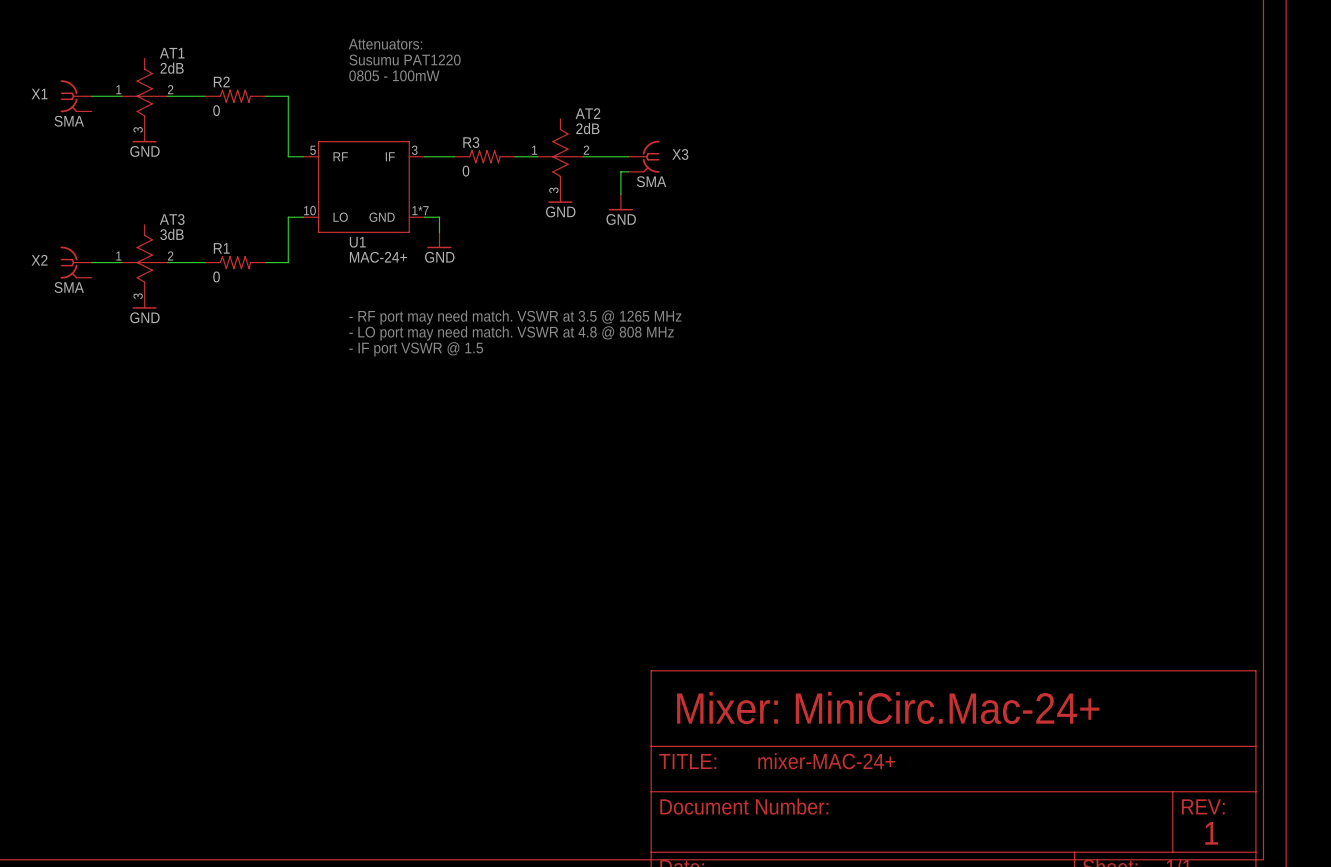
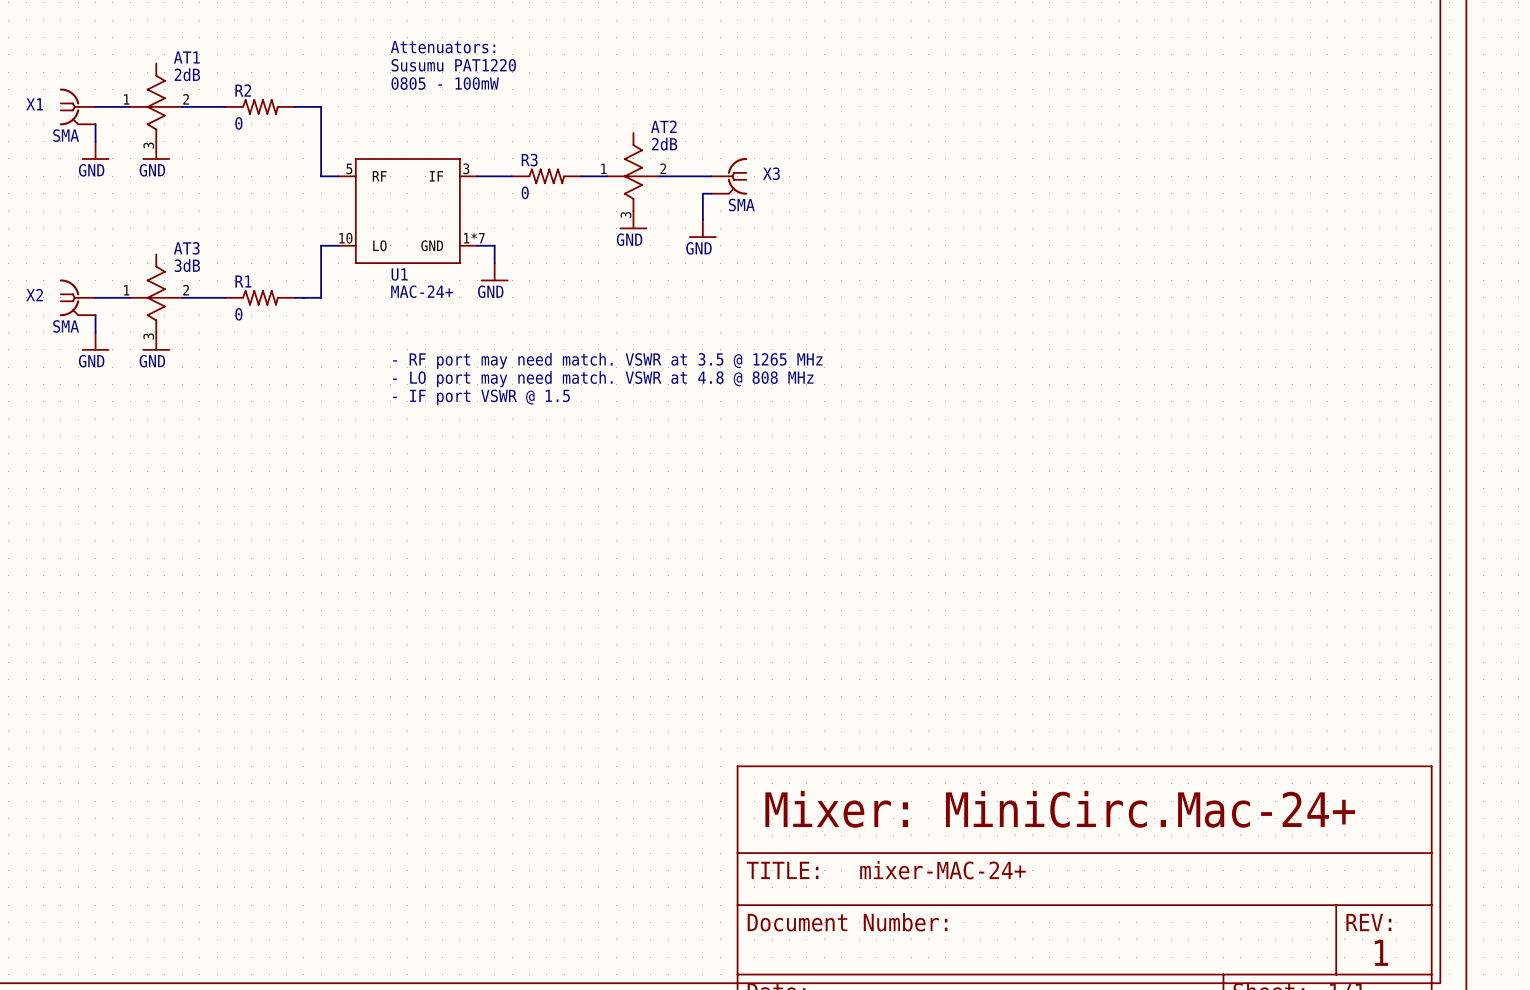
wire: none -> (95, 124) (95, 141)
power symbol: none -> GND (95, 150)
wire: none -> (95, 315) (95, 332)
power symbol: none -> GND (95, 341)

